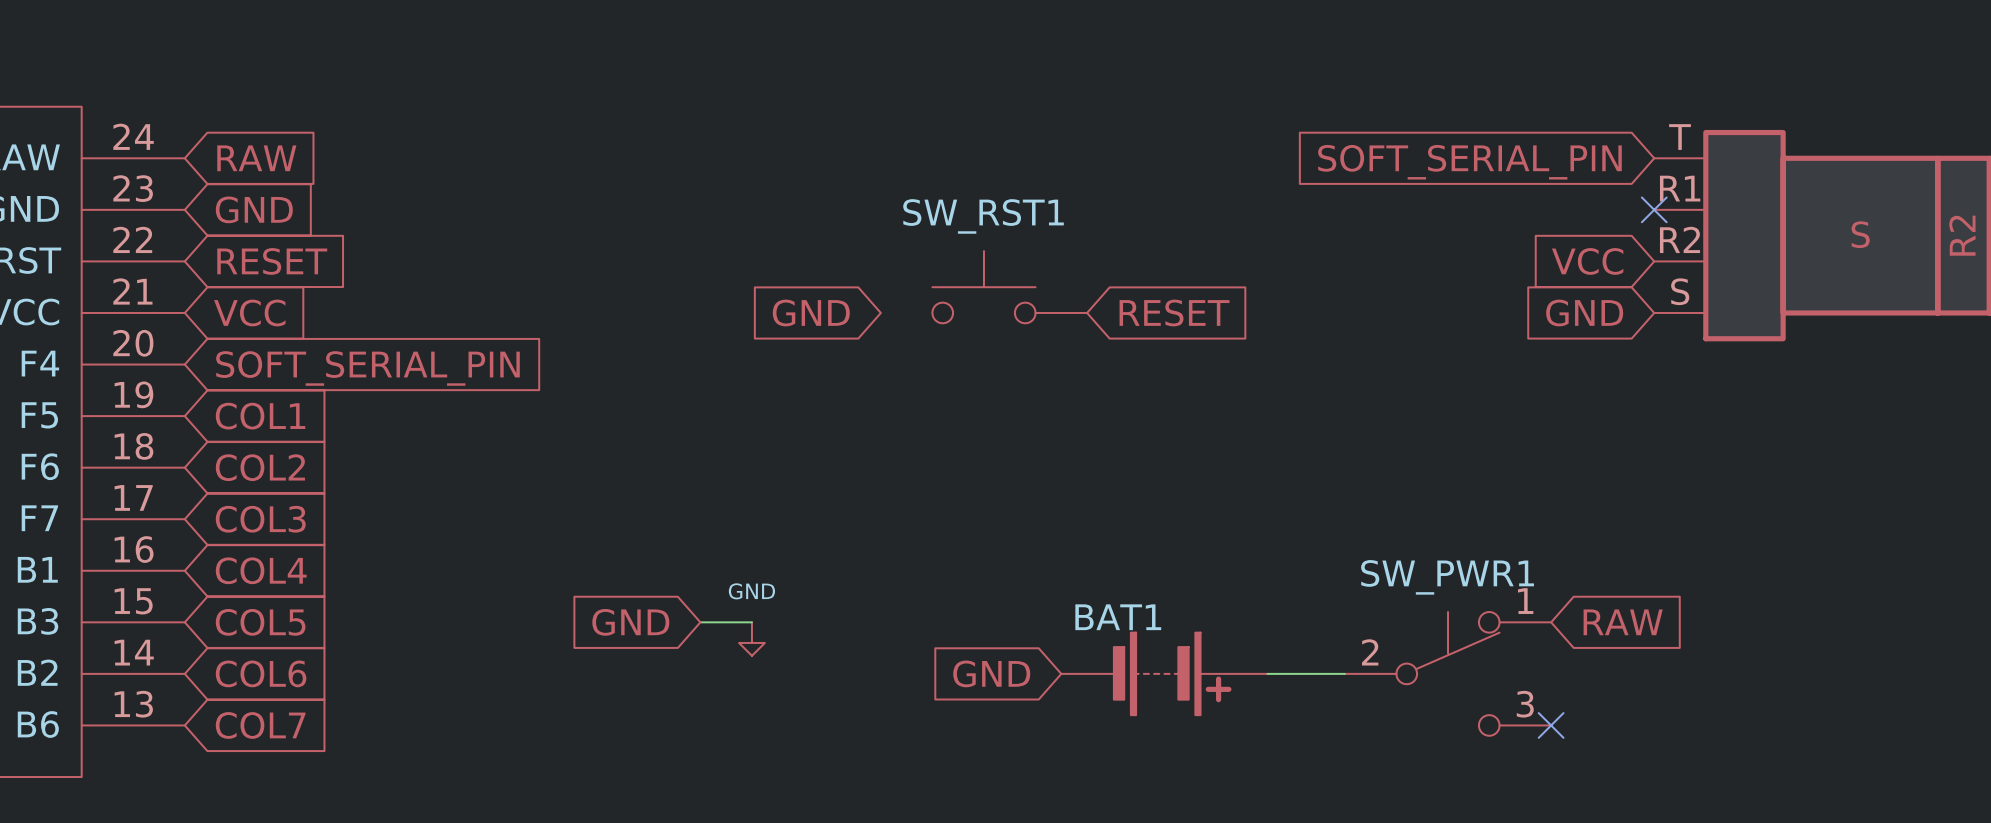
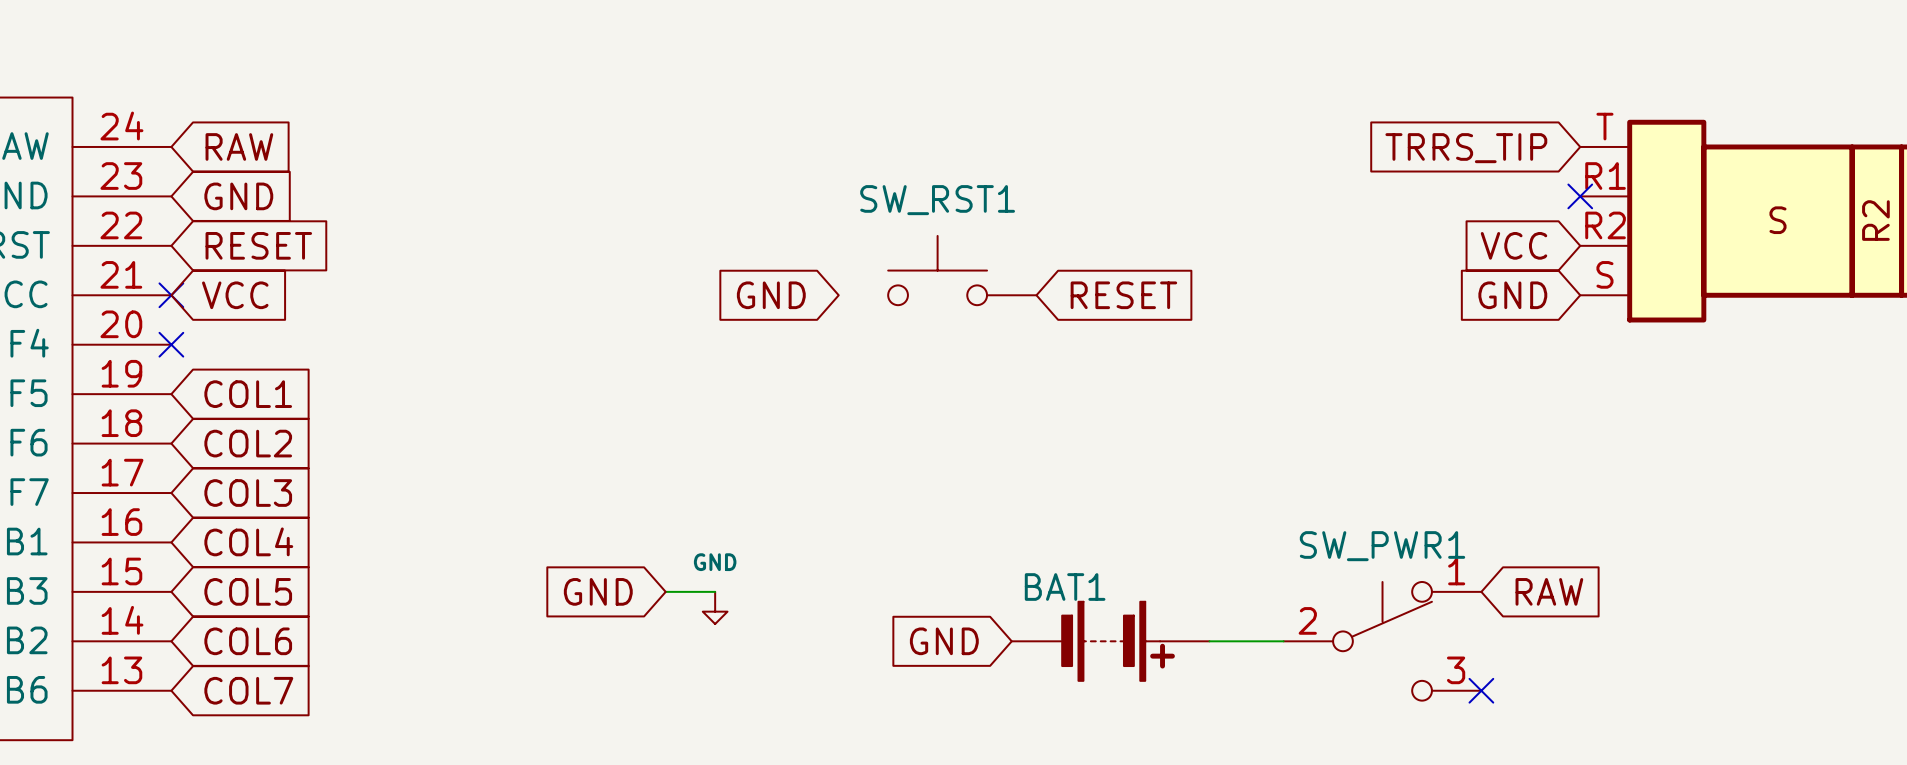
global label: SOFT_SERIAL_PIN (1469, 162) -> TRRS_TIP (1466, 148)
no-connect mark: none -> (171, 295)
no-connect mark: none -> (171, 344)
global label: SOFT_SERIAL_PIN (367, 368) -> none

